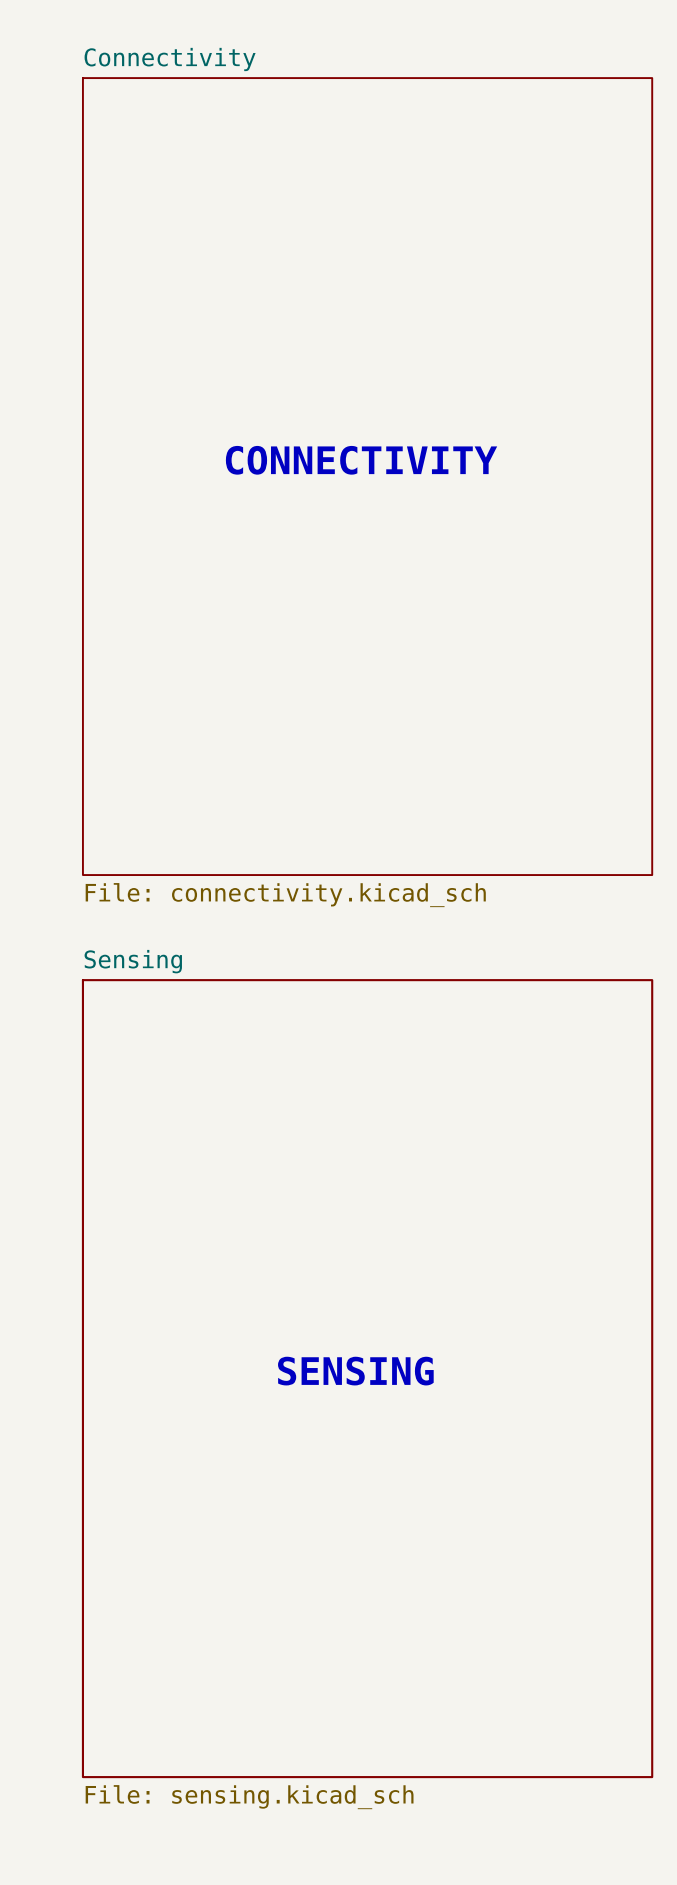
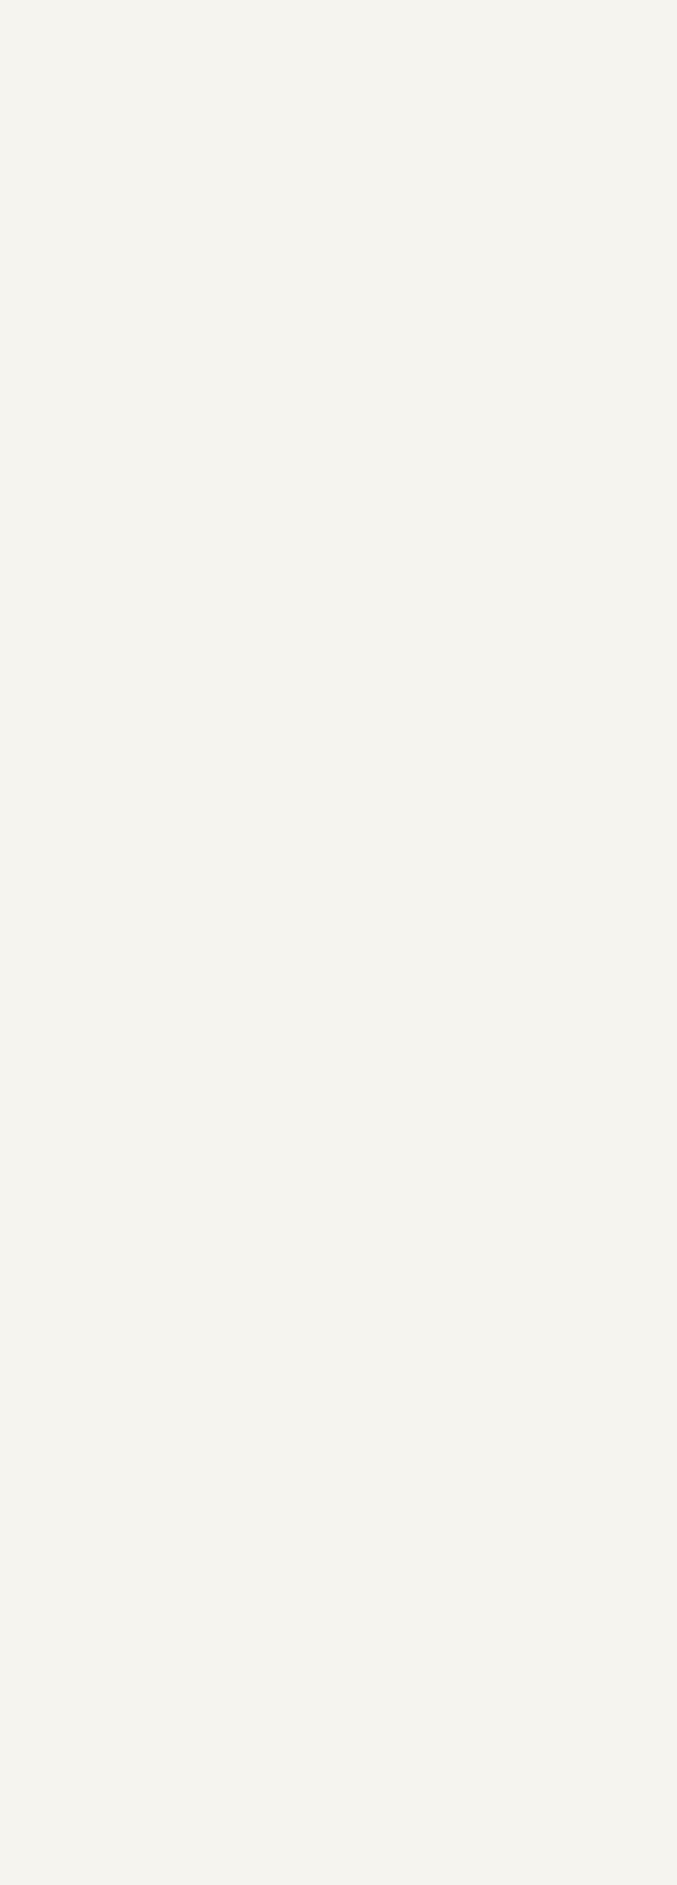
text: CONNECTIVITY (361, 460) -> none
sheet Connectivity: File: connectivity.kicad_sch (367, 476) -> none
text: SENSING (355, 1371) -> none
sheet Sensing: File: sensing.kicad_sch (367, 1378) -> none

